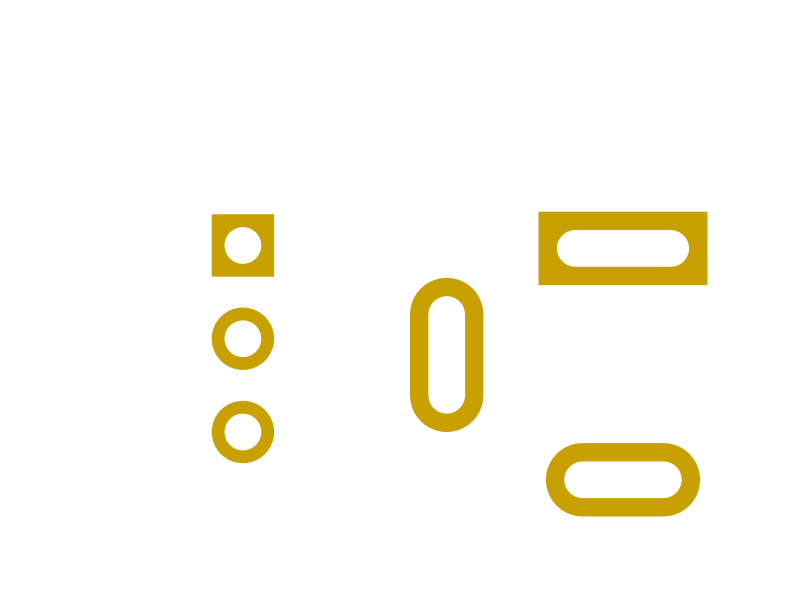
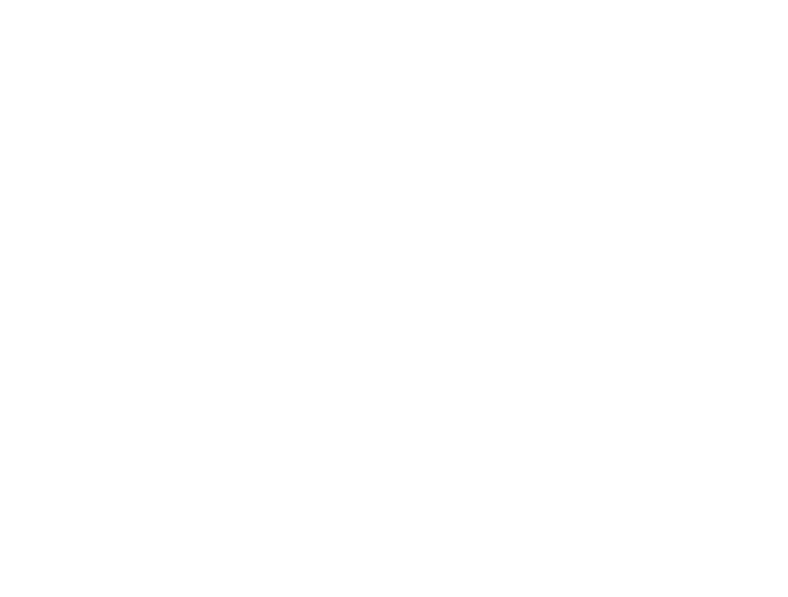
part: (242, 338) -> none
part: (558, 364) -> none

